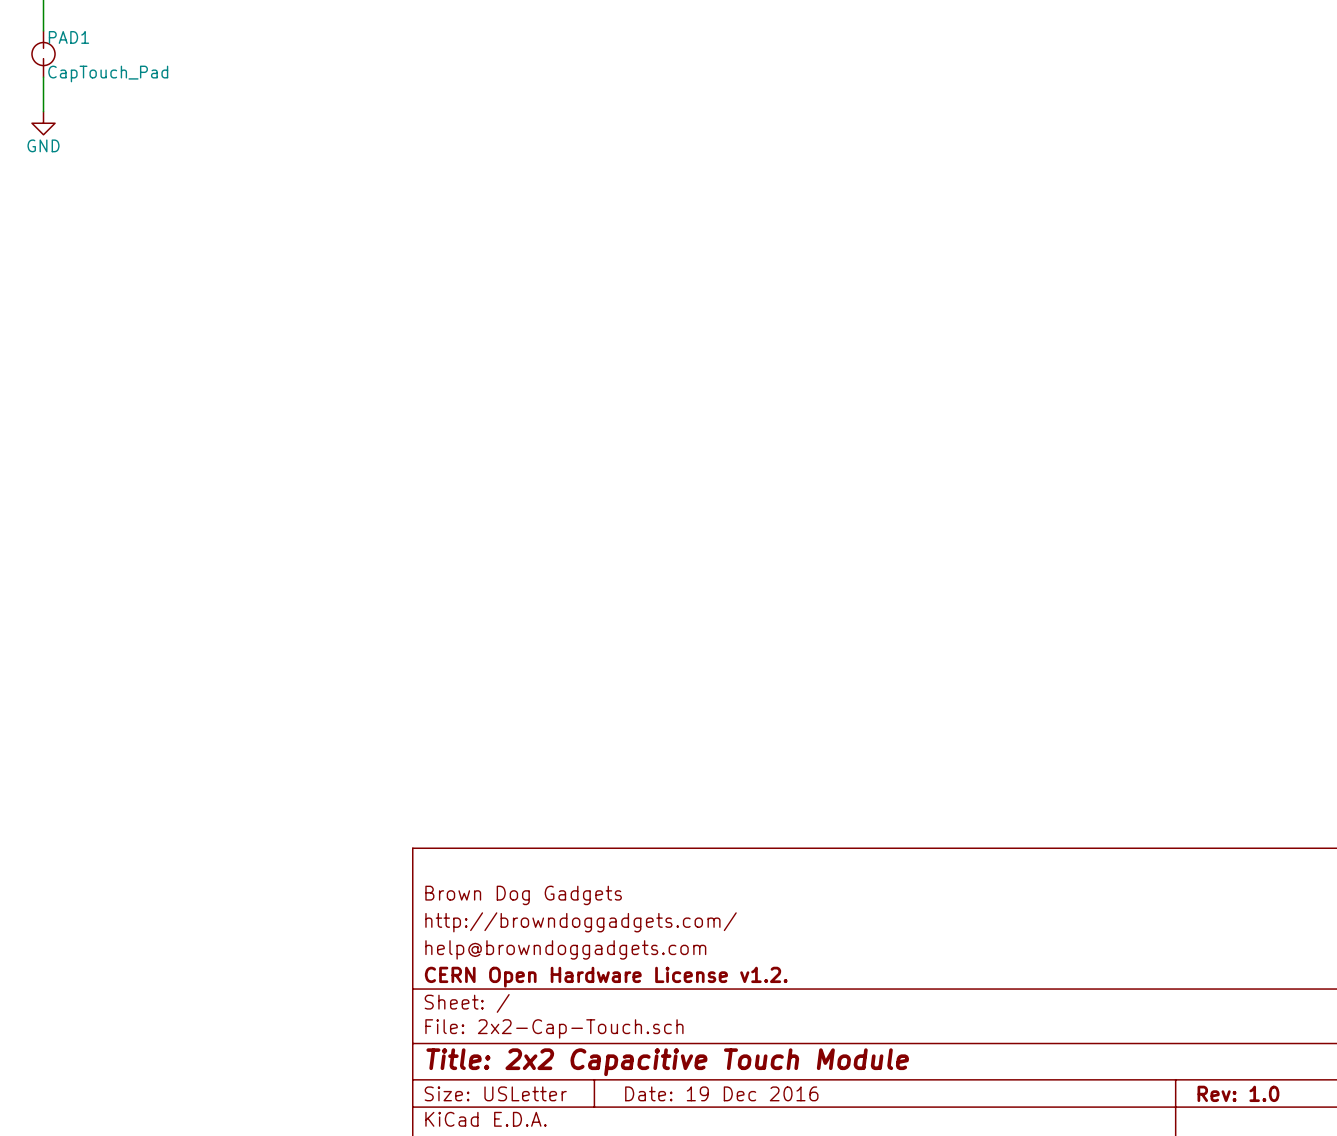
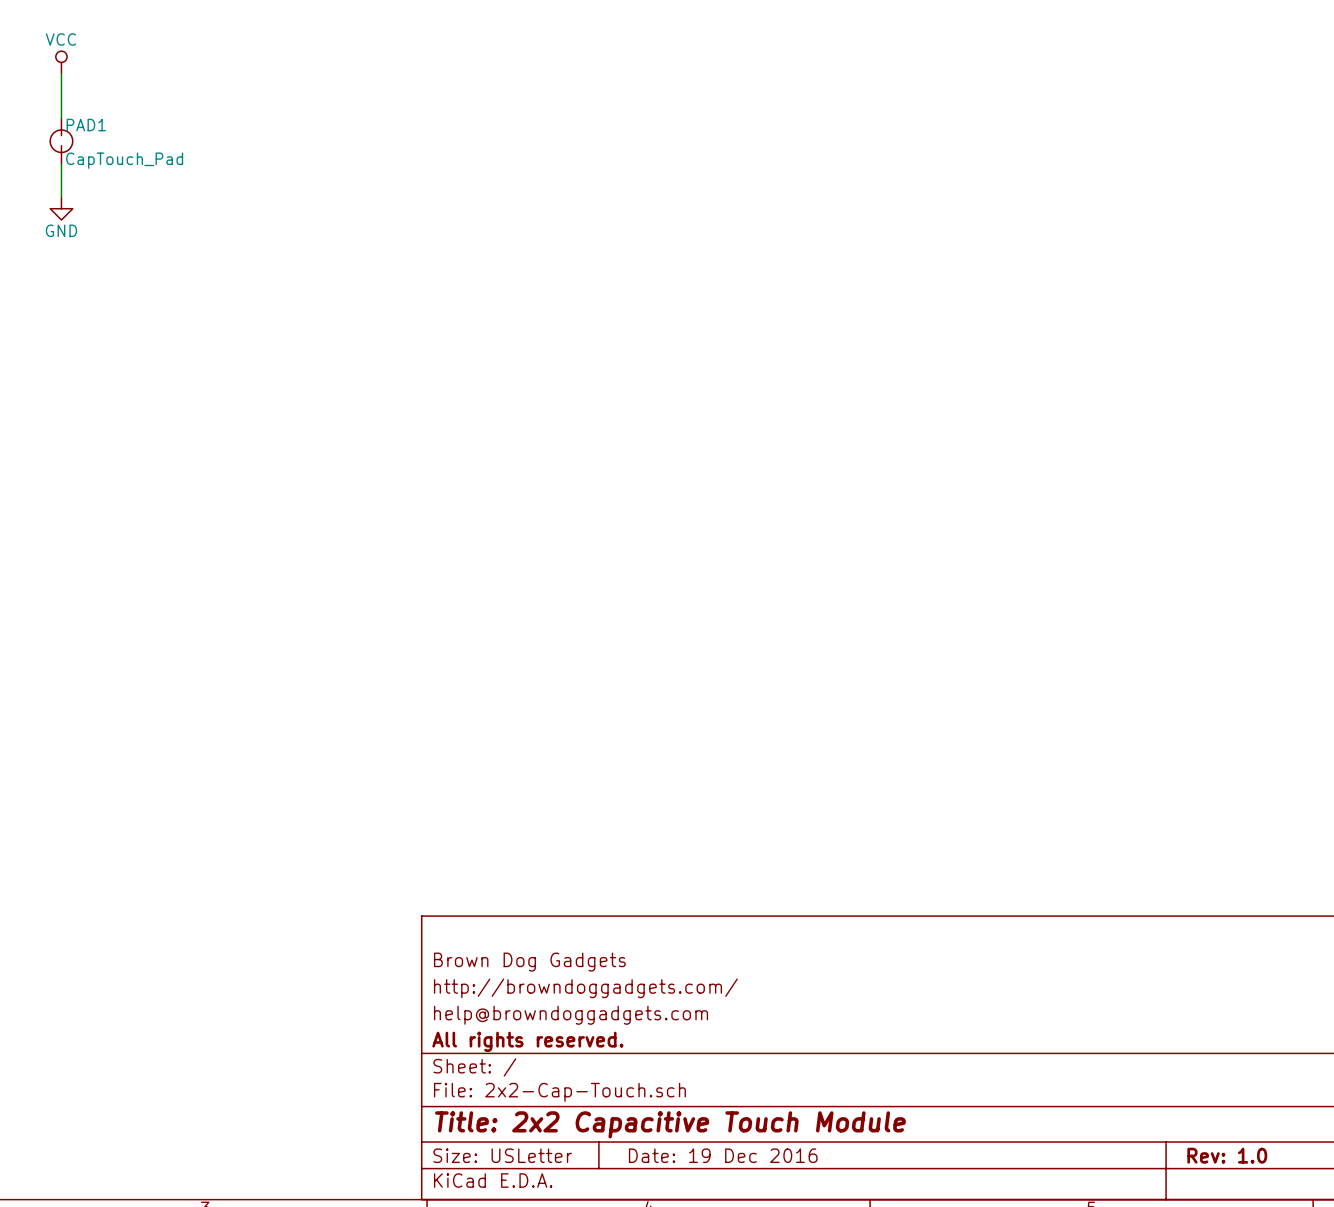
title block: CERN Open Hardware License v1.2. (606, 977) -> All rights reserved. (527, 1041)

